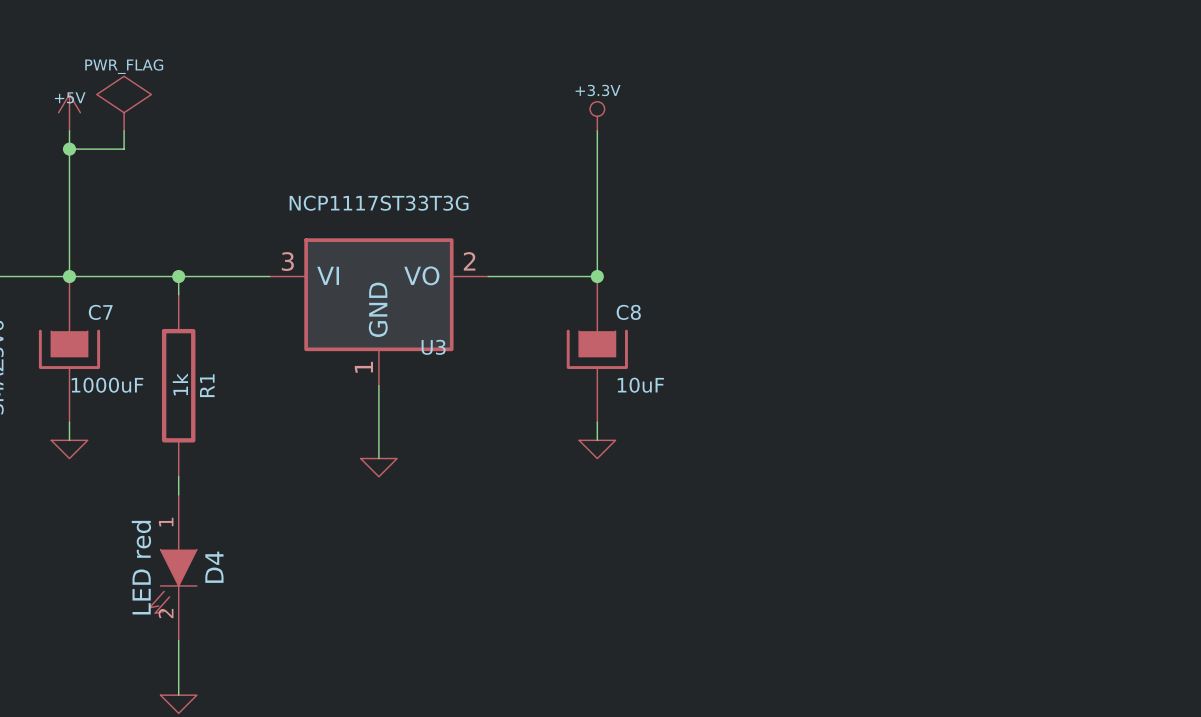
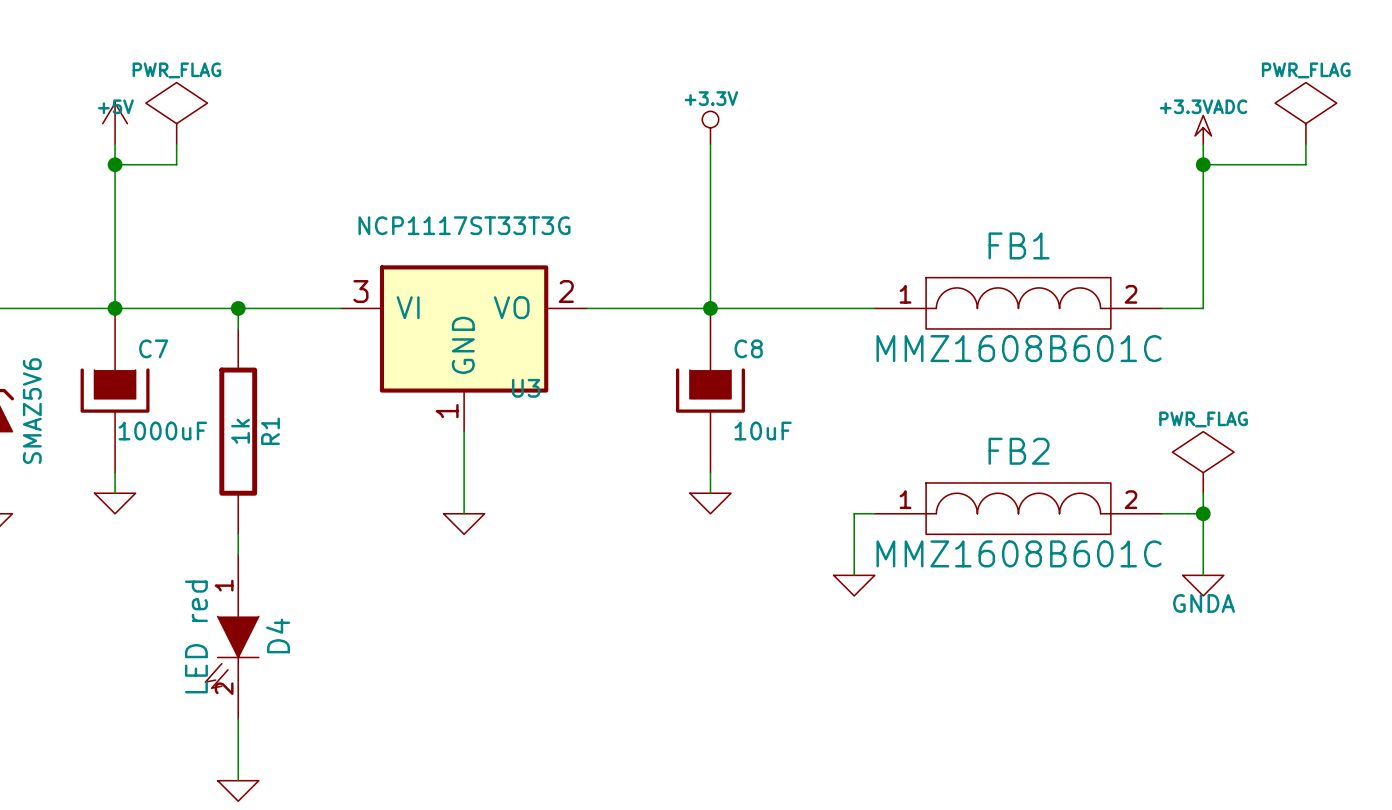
power symbol: none -> PWR_FLAG (1305, 113)
power symbol: none -> +3.3VADC (1203, 129)
wire: none -> (1203, 144) (1203, 308) (1162, 308)
wire: none -> (1305, 144) (1305, 164) (1203, 164)
junction: none -> (1203, 164)
FB1: none -> MMZ1608B601C (1018, 303)
wire: none -> (710, 308) (874, 308)
power symbol: none -> PWR_FLAG (1203, 462)
wire: none -> (1203, 493) (1203, 575)
FB2: none -> MMZ1608B601C (1018, 508)
wire: none -> (874, 513) (854, 513) (854, 575)
wire: none -> (1162, 513) (1203, 513)
junction: none -> (1203, 513)
power symbol: none -> (854, 585)
power symbol: none -> GNDA (1203, 585)

